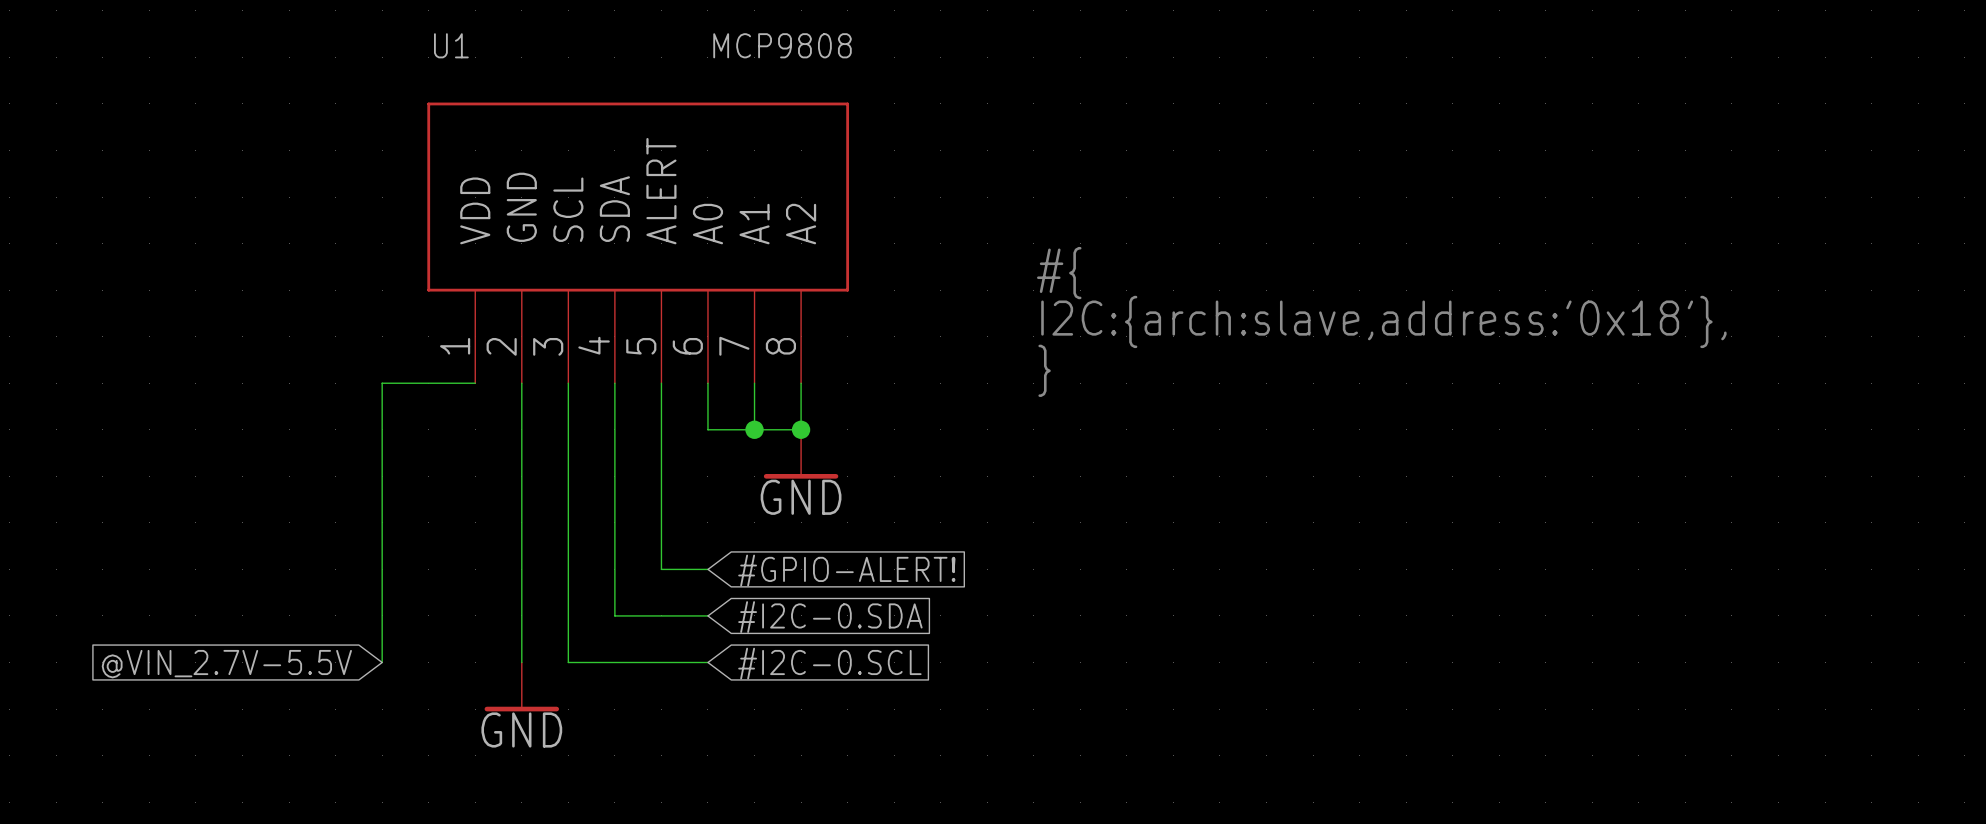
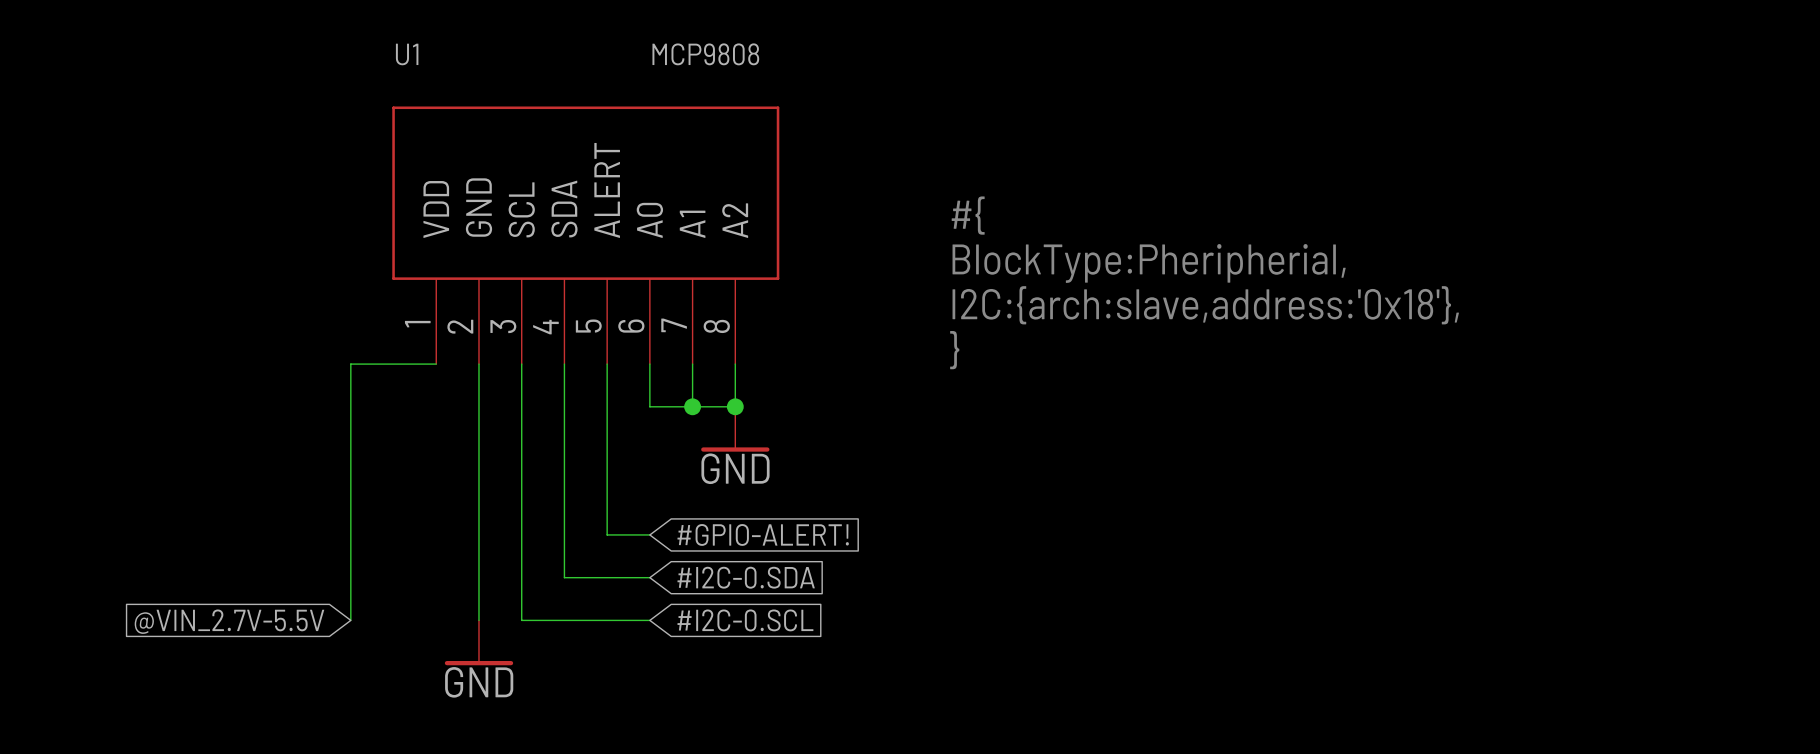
text: none -> #{ (968, 215)
text: #{ (1059, 273) -> BlockType:Pheripherial, (1149, 263)

